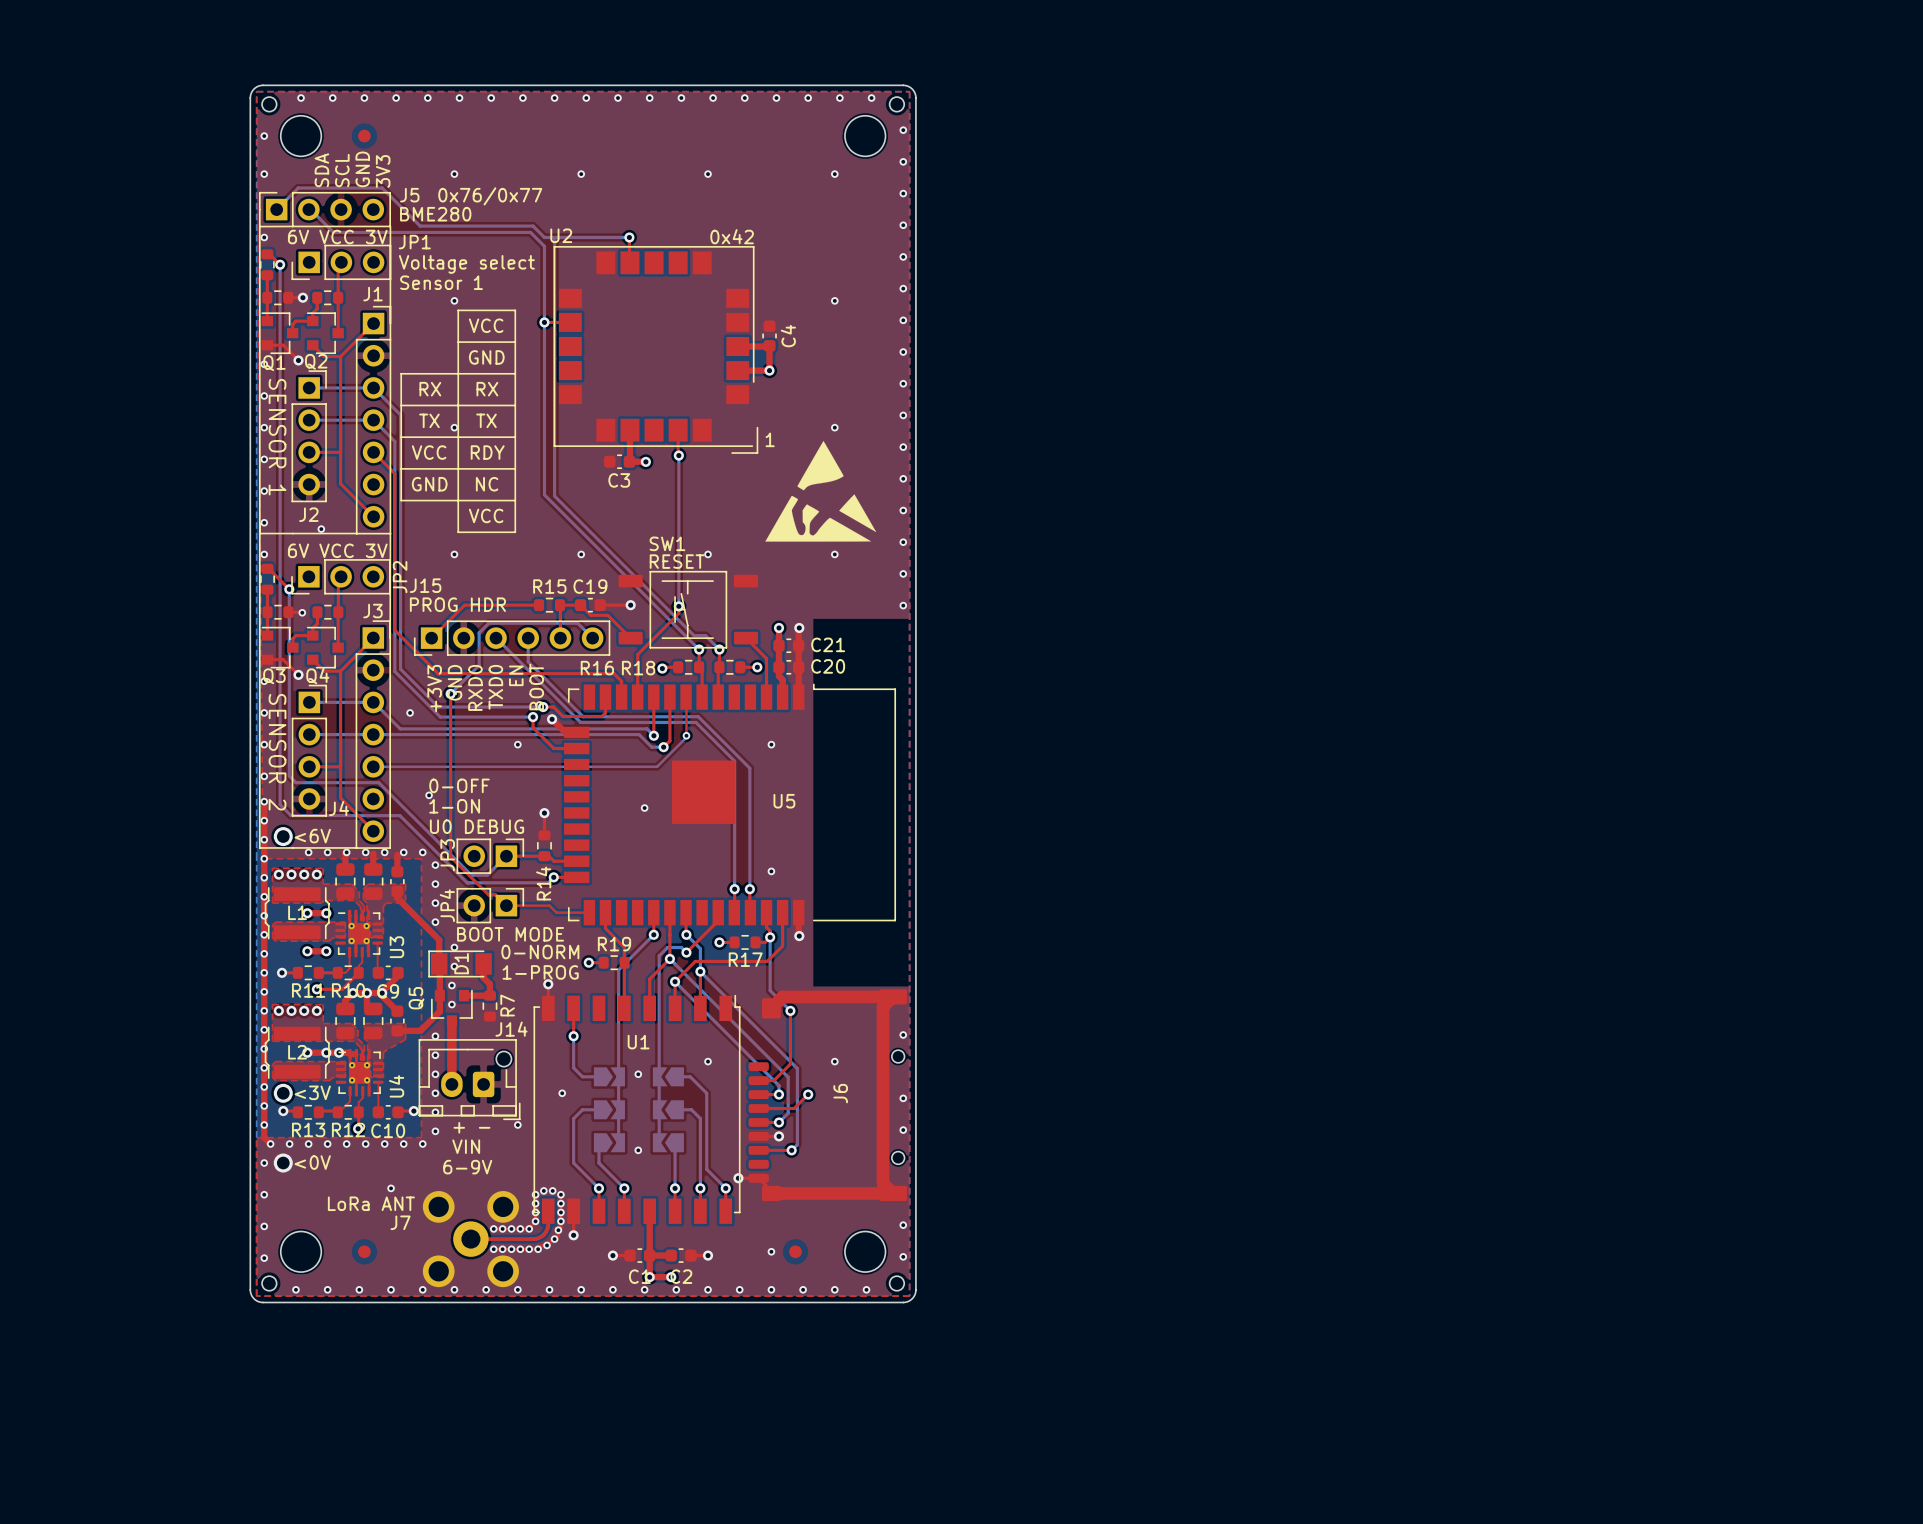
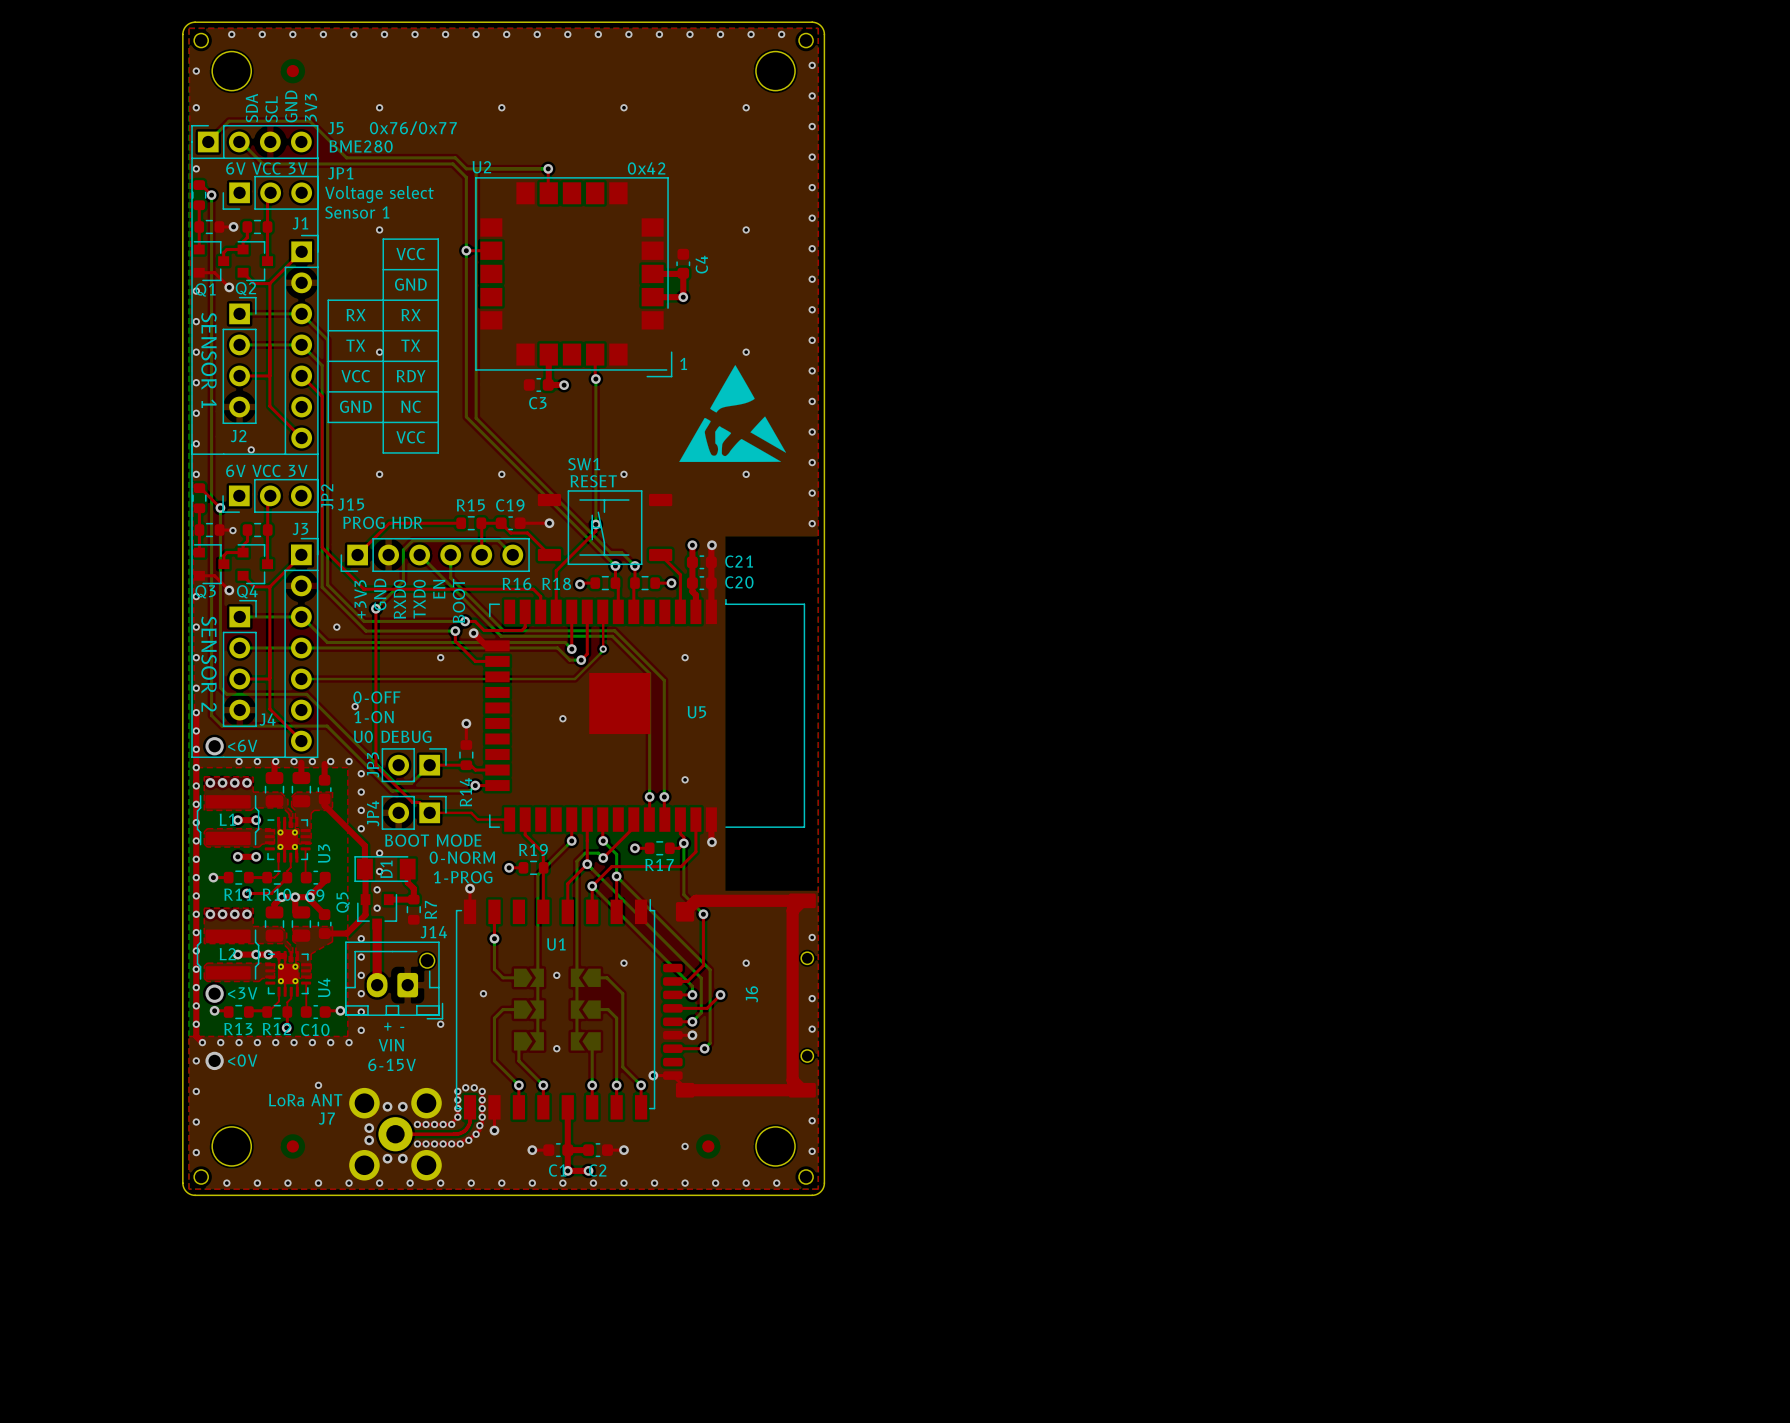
text: 6-9V (467, 1167) -> 6-15V (392, 1064)
via: none -> (387, 1106)
via: none -> (402, 1106)
via: none -> (369, 1128)
via: none -> (369, 1140)
via: none -> (387, 1158)
via: none -> (402, 1158)

